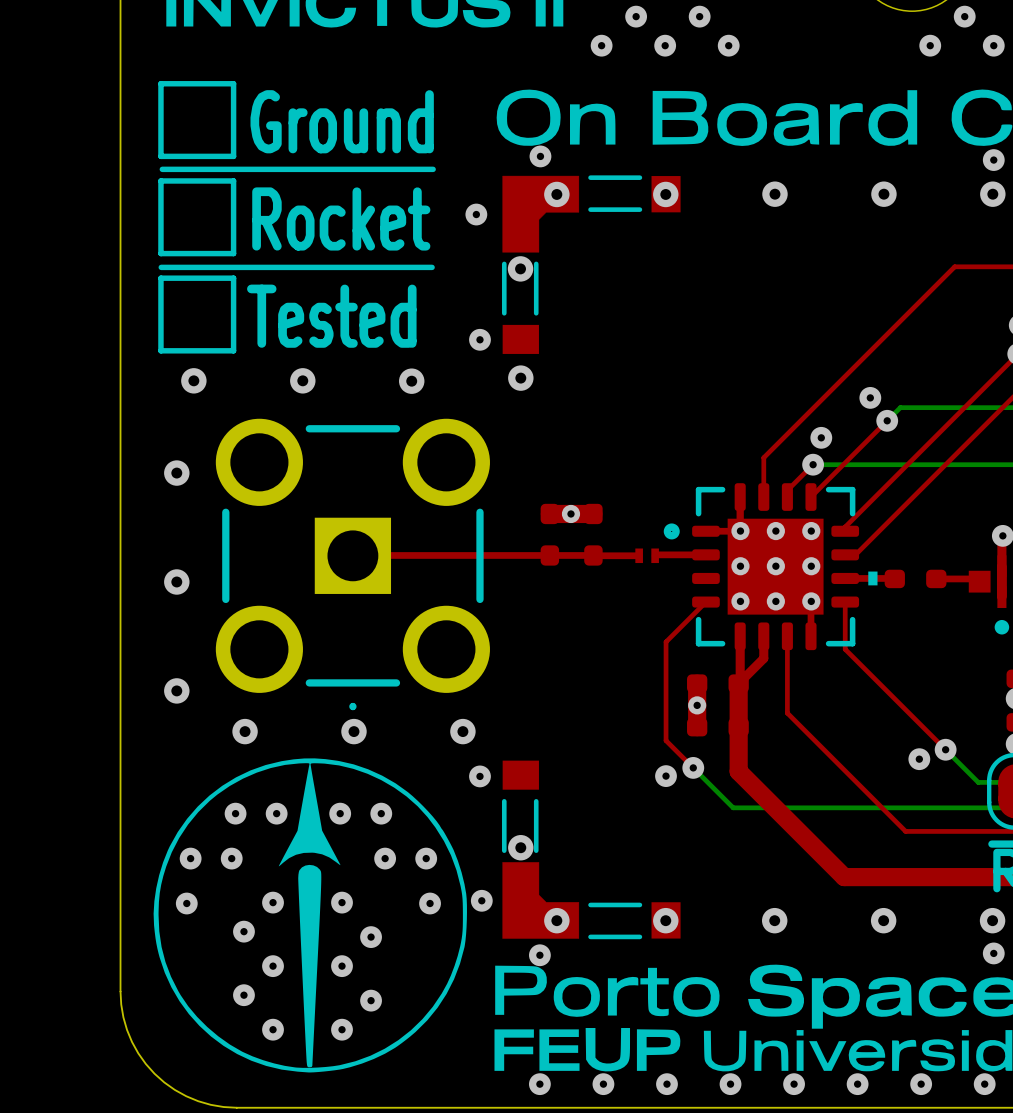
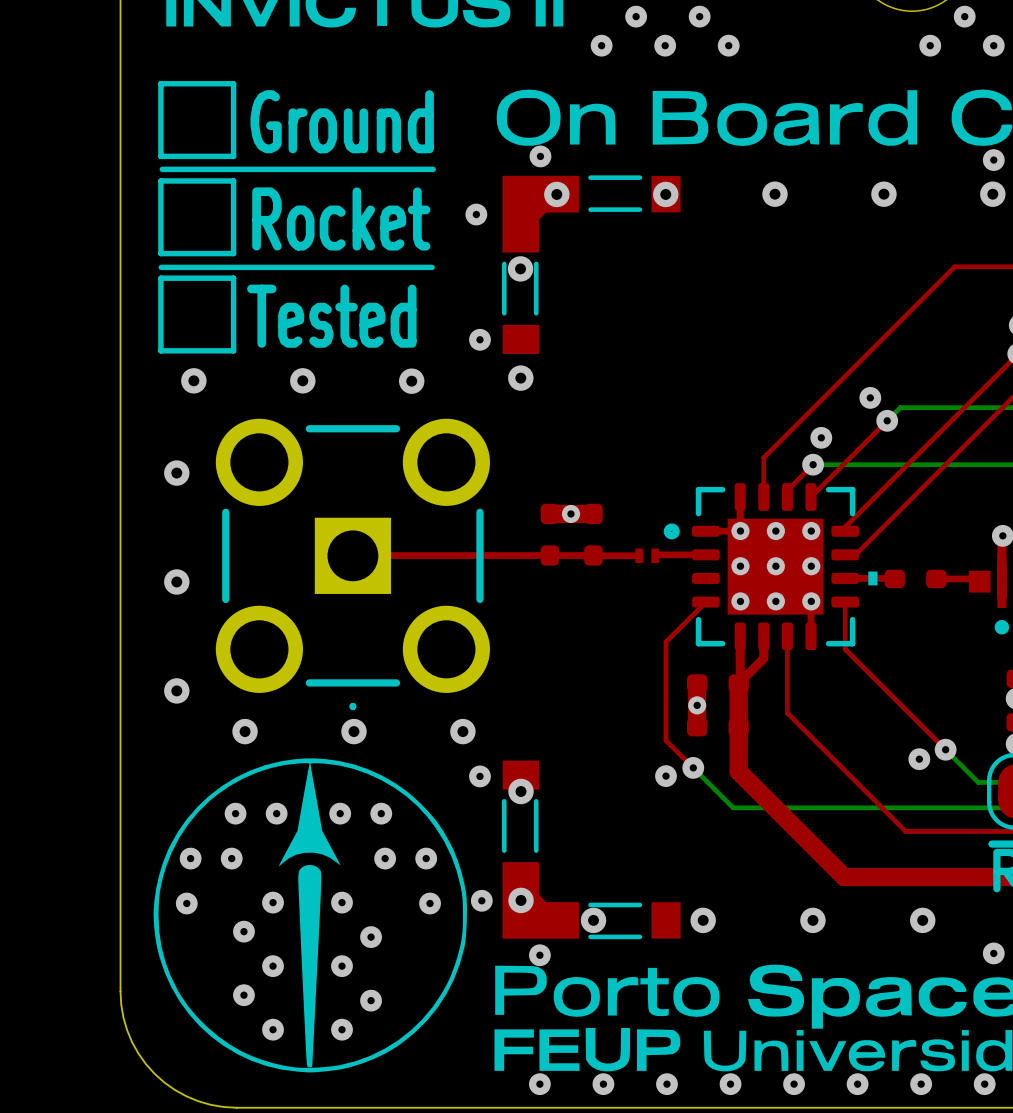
via: none -> (521, 791)
via: (520, 847) -> none
via: none -> (521, 900)
via: (556, 920) -> none
via: none -> (593, 920)
via: (665, 920) -> none
via: none -> (703, 920)
via: (774, 920) -> none
via: none -> (812, 920)
via: (883, 920) -> none
via: none -> (922, 920)
via: (992, 920) -> none

